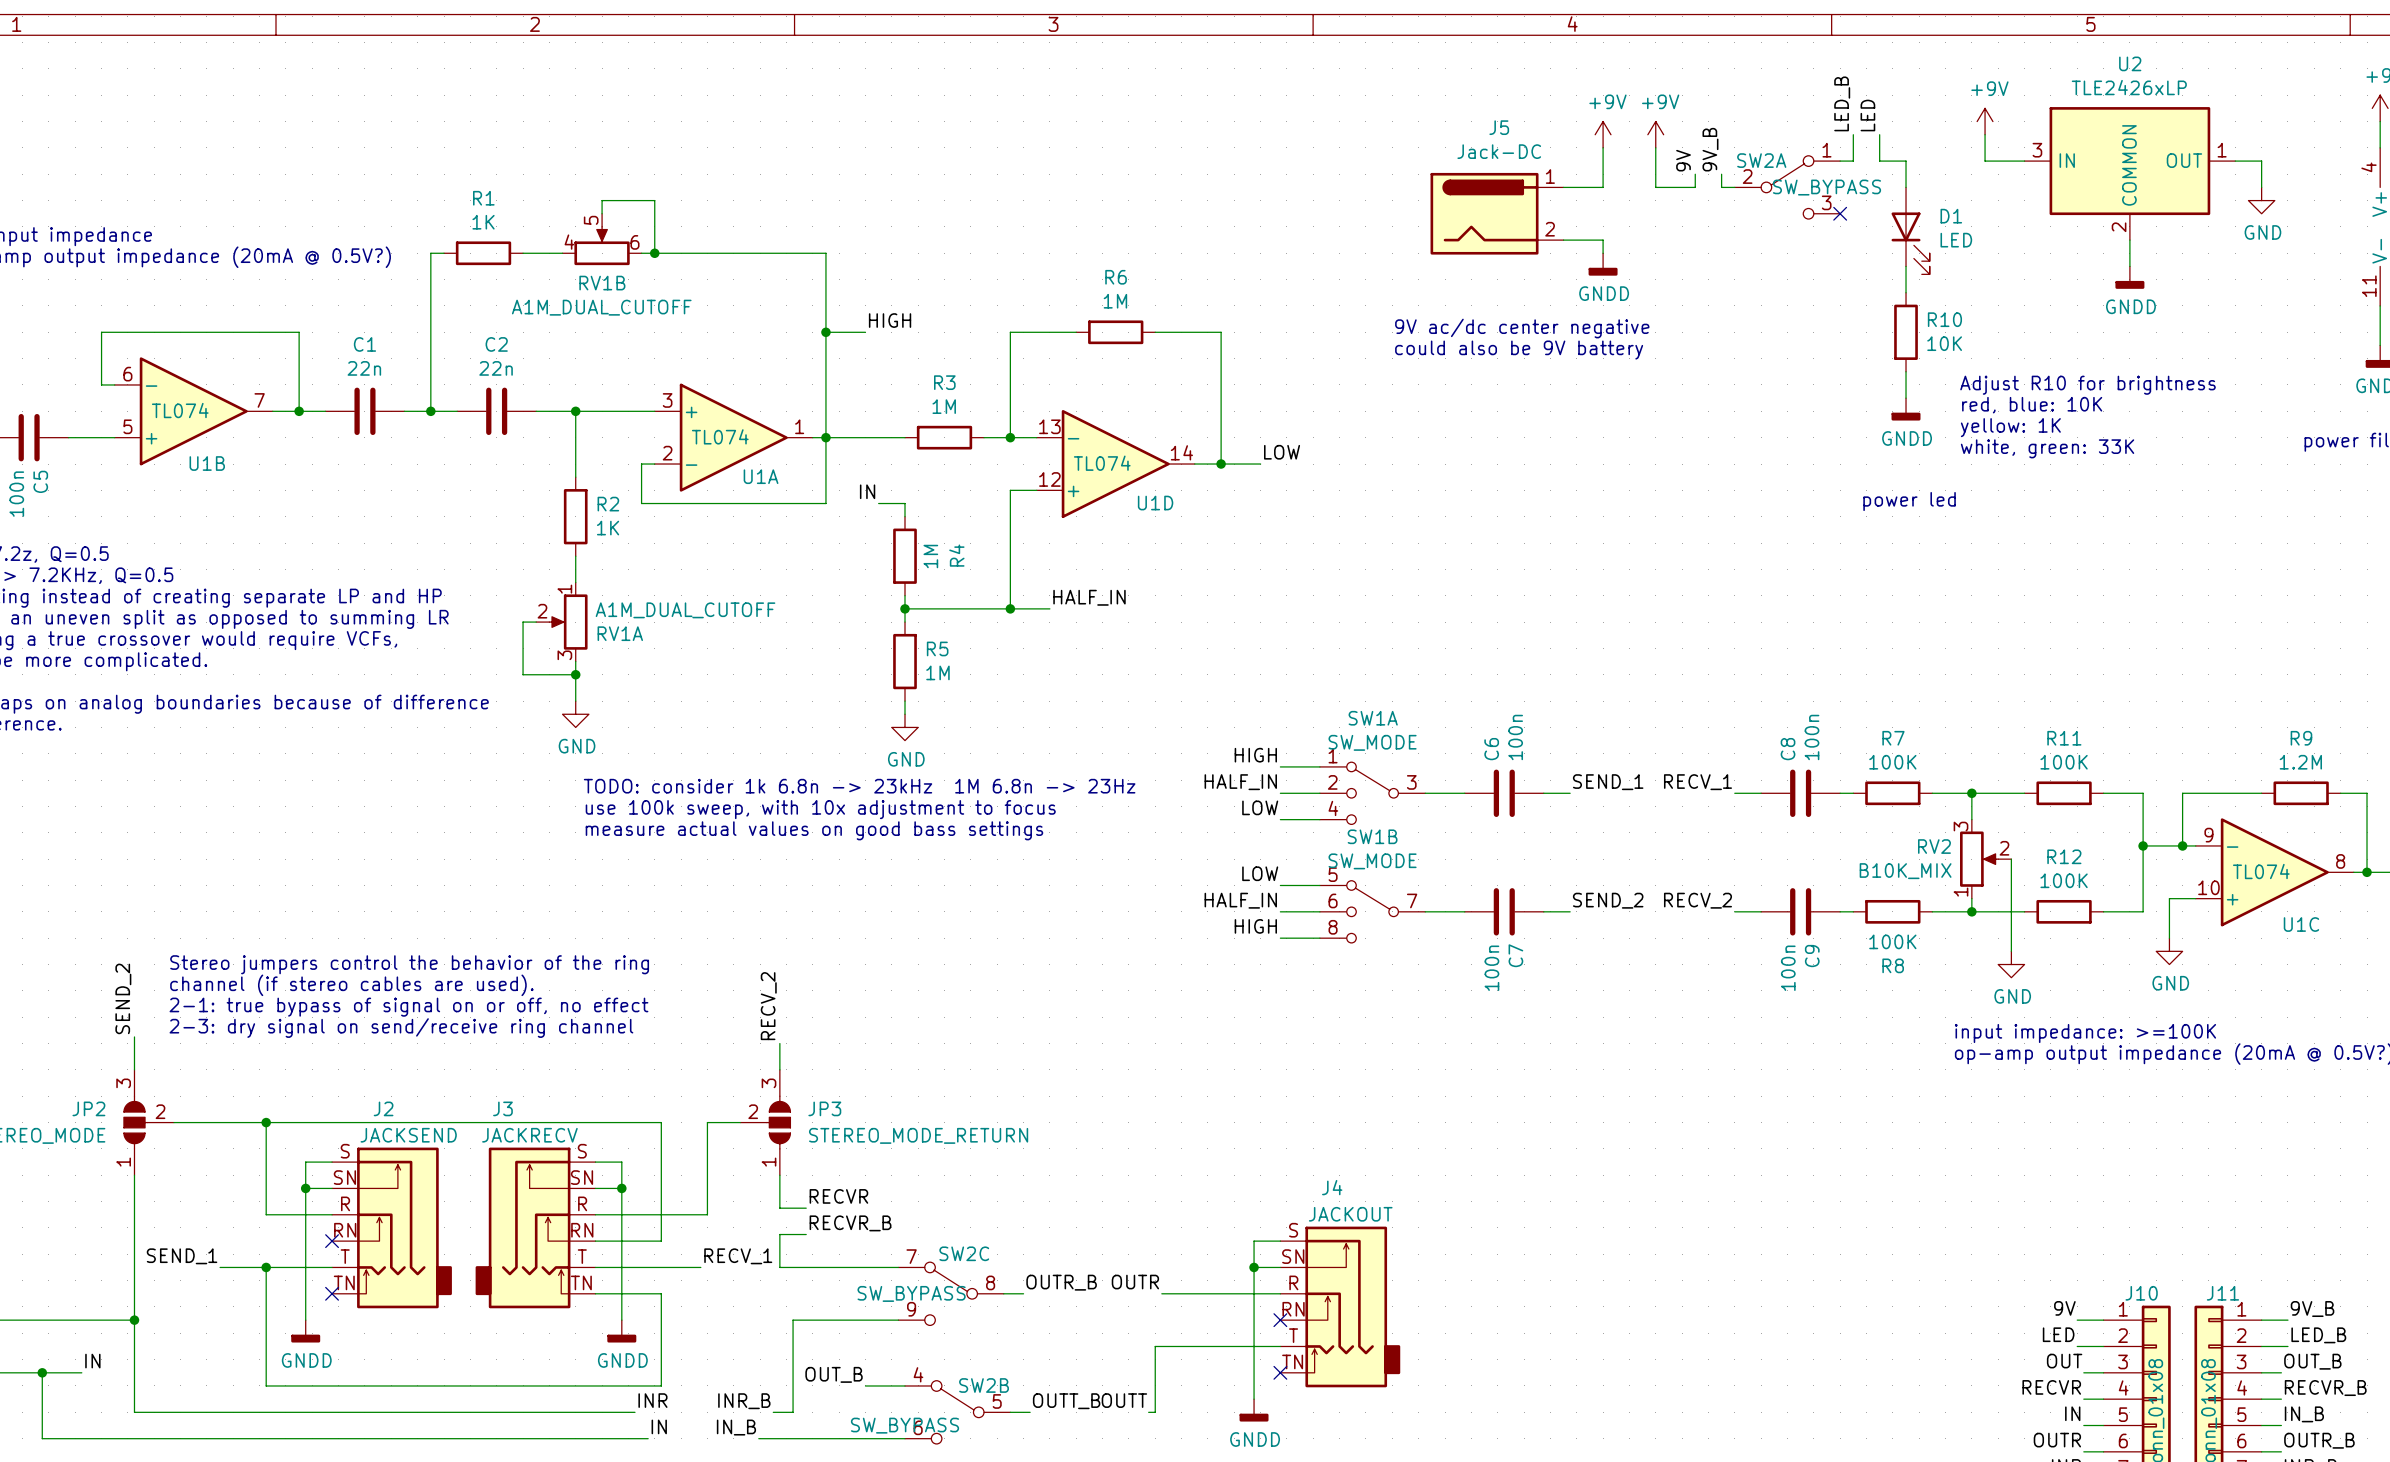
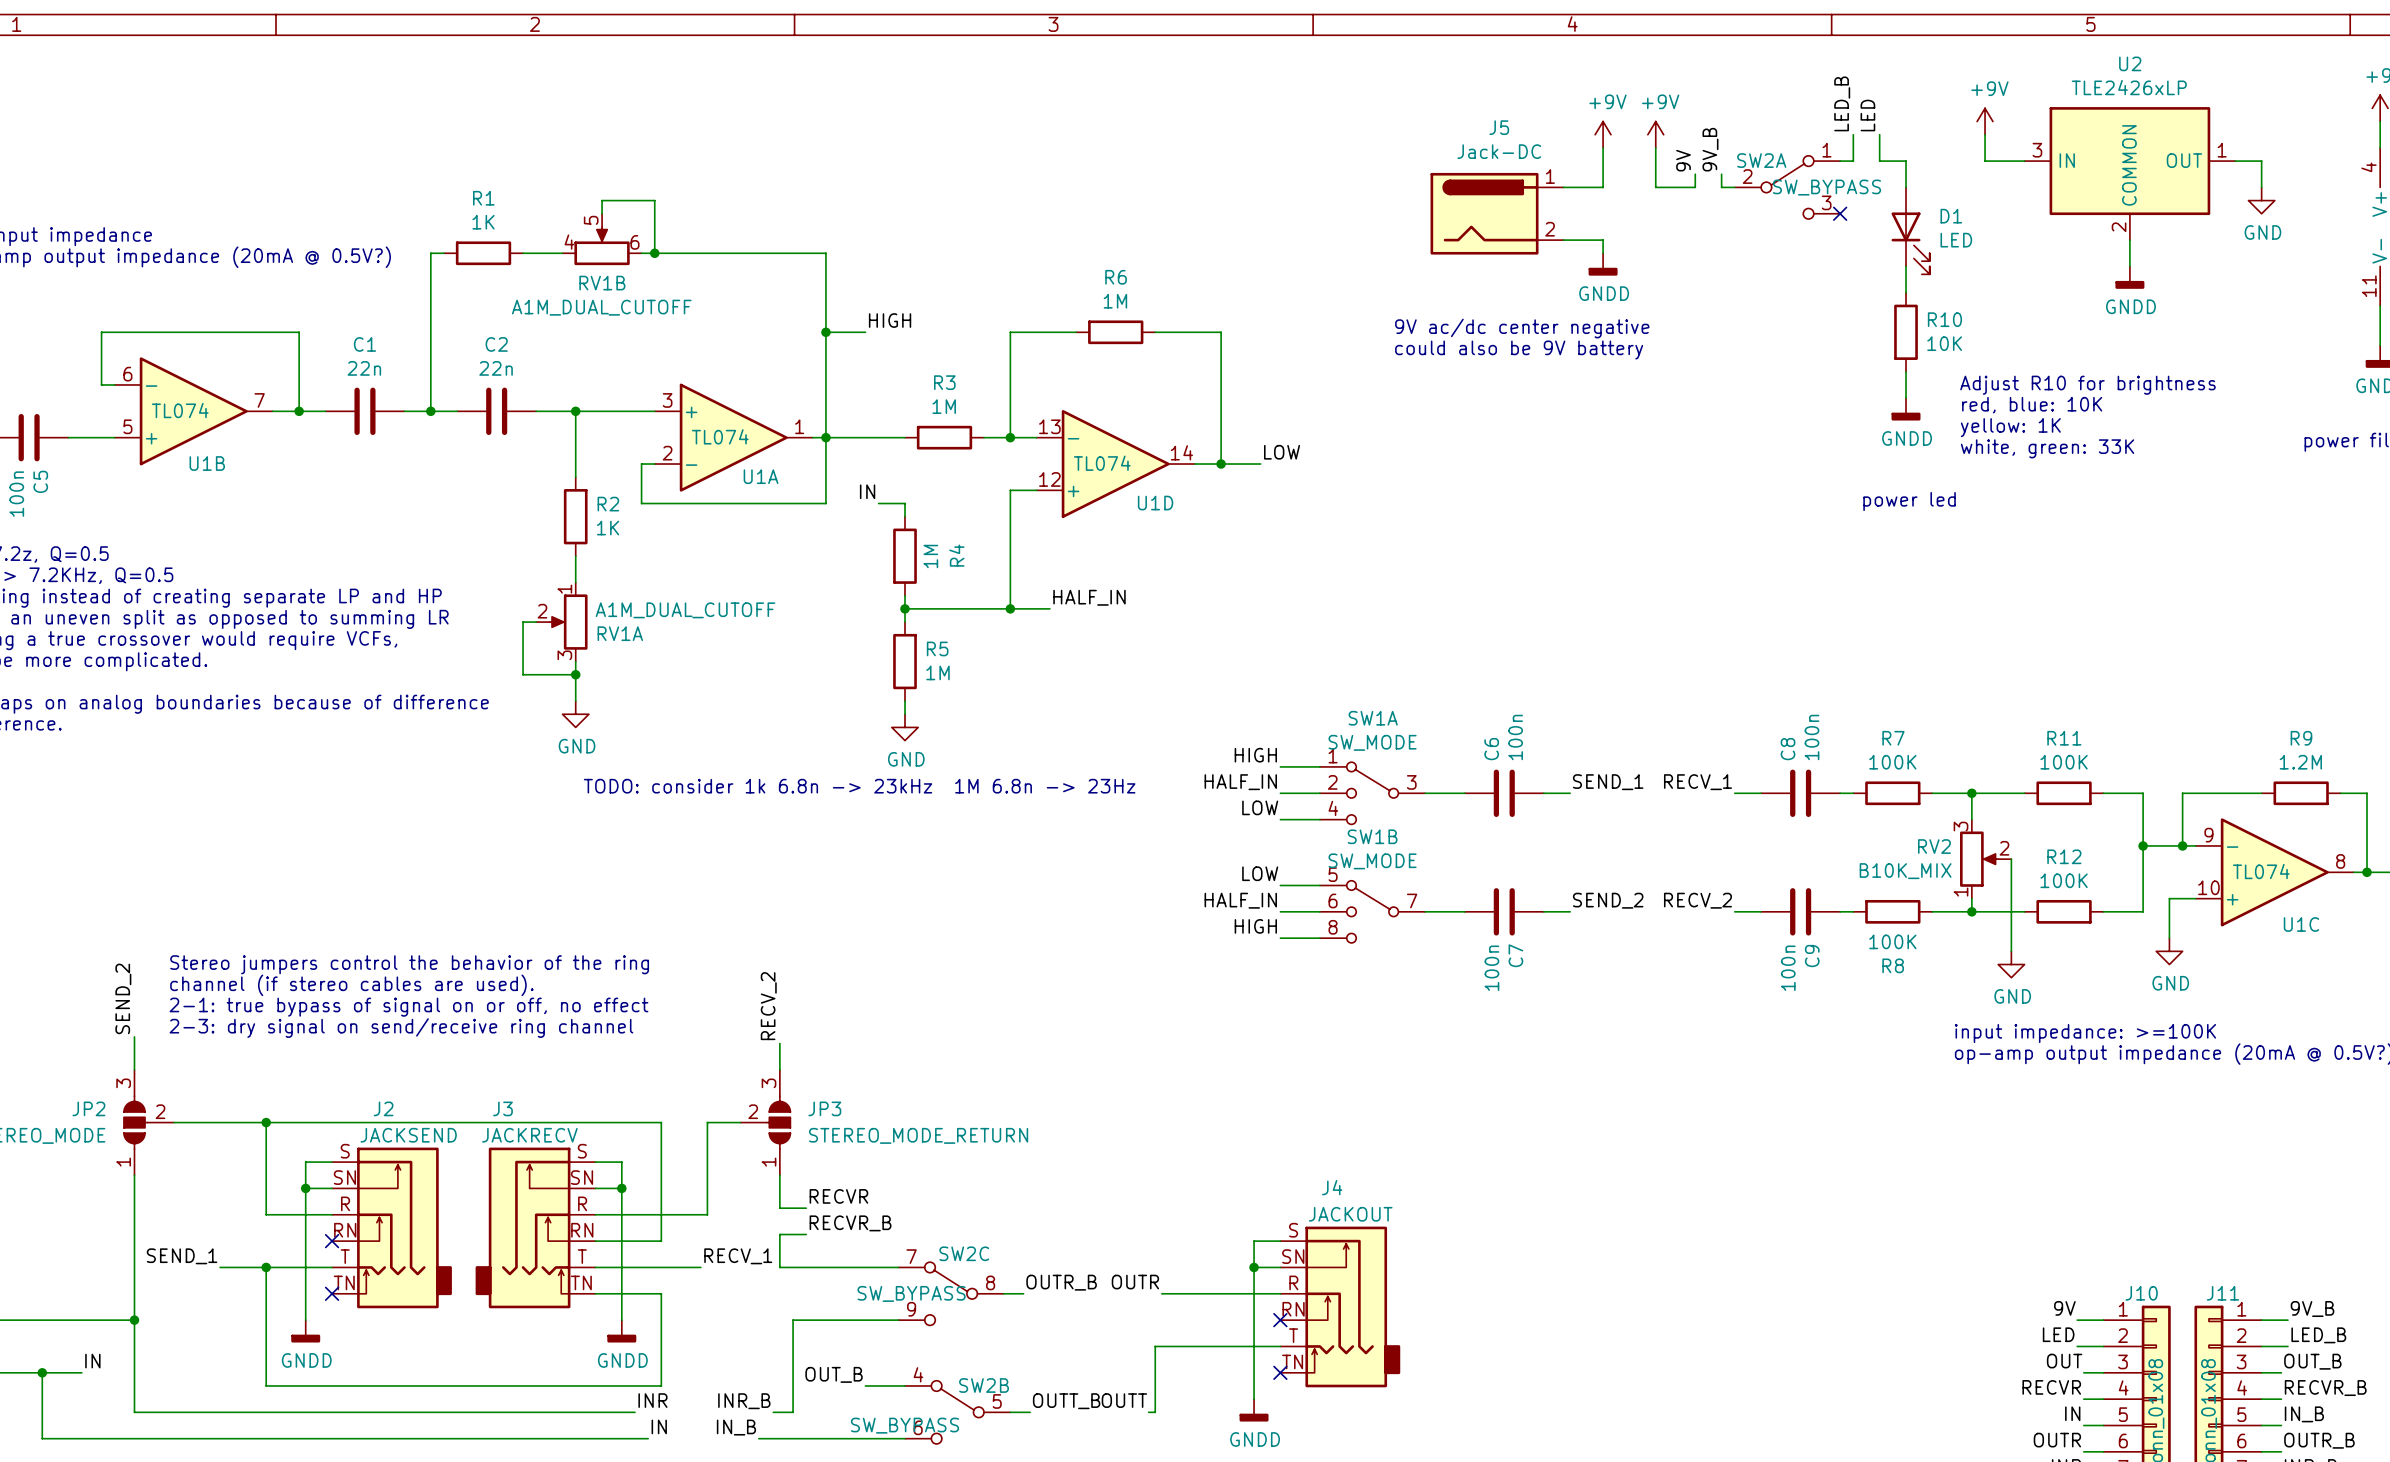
text: use 100k sweep, with 10x adjustment to focus (820, 809) -> none
text: measure actual values on good bass settings (814, 830) -> none

